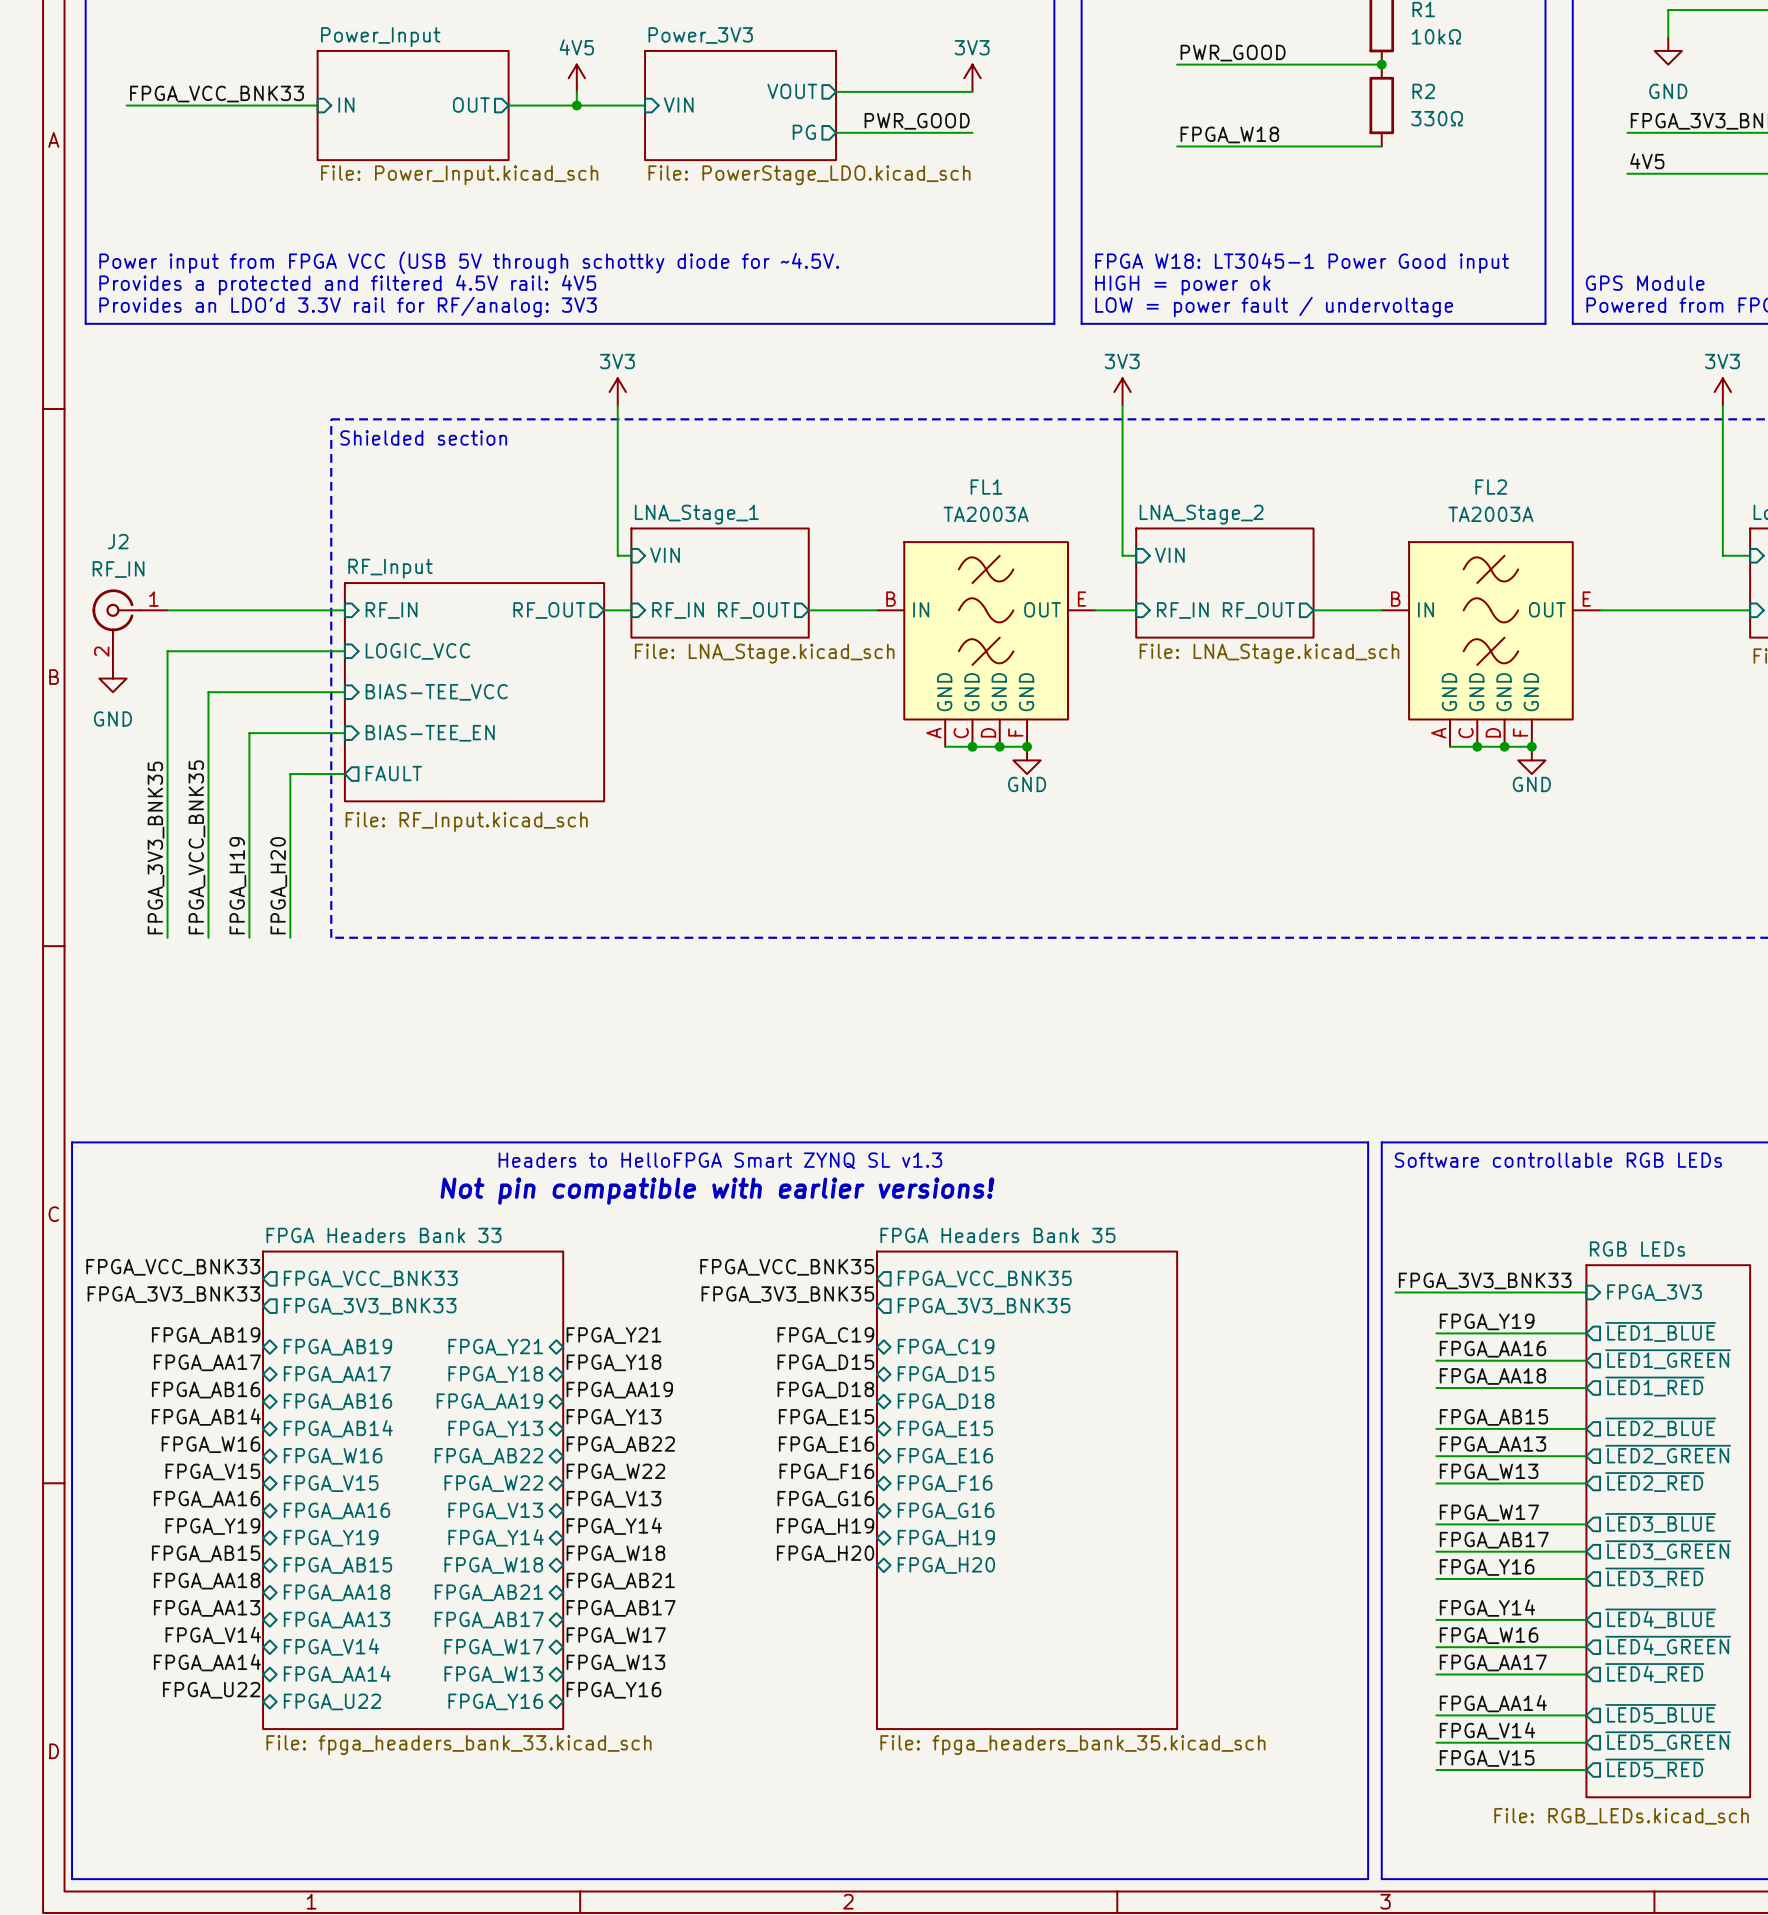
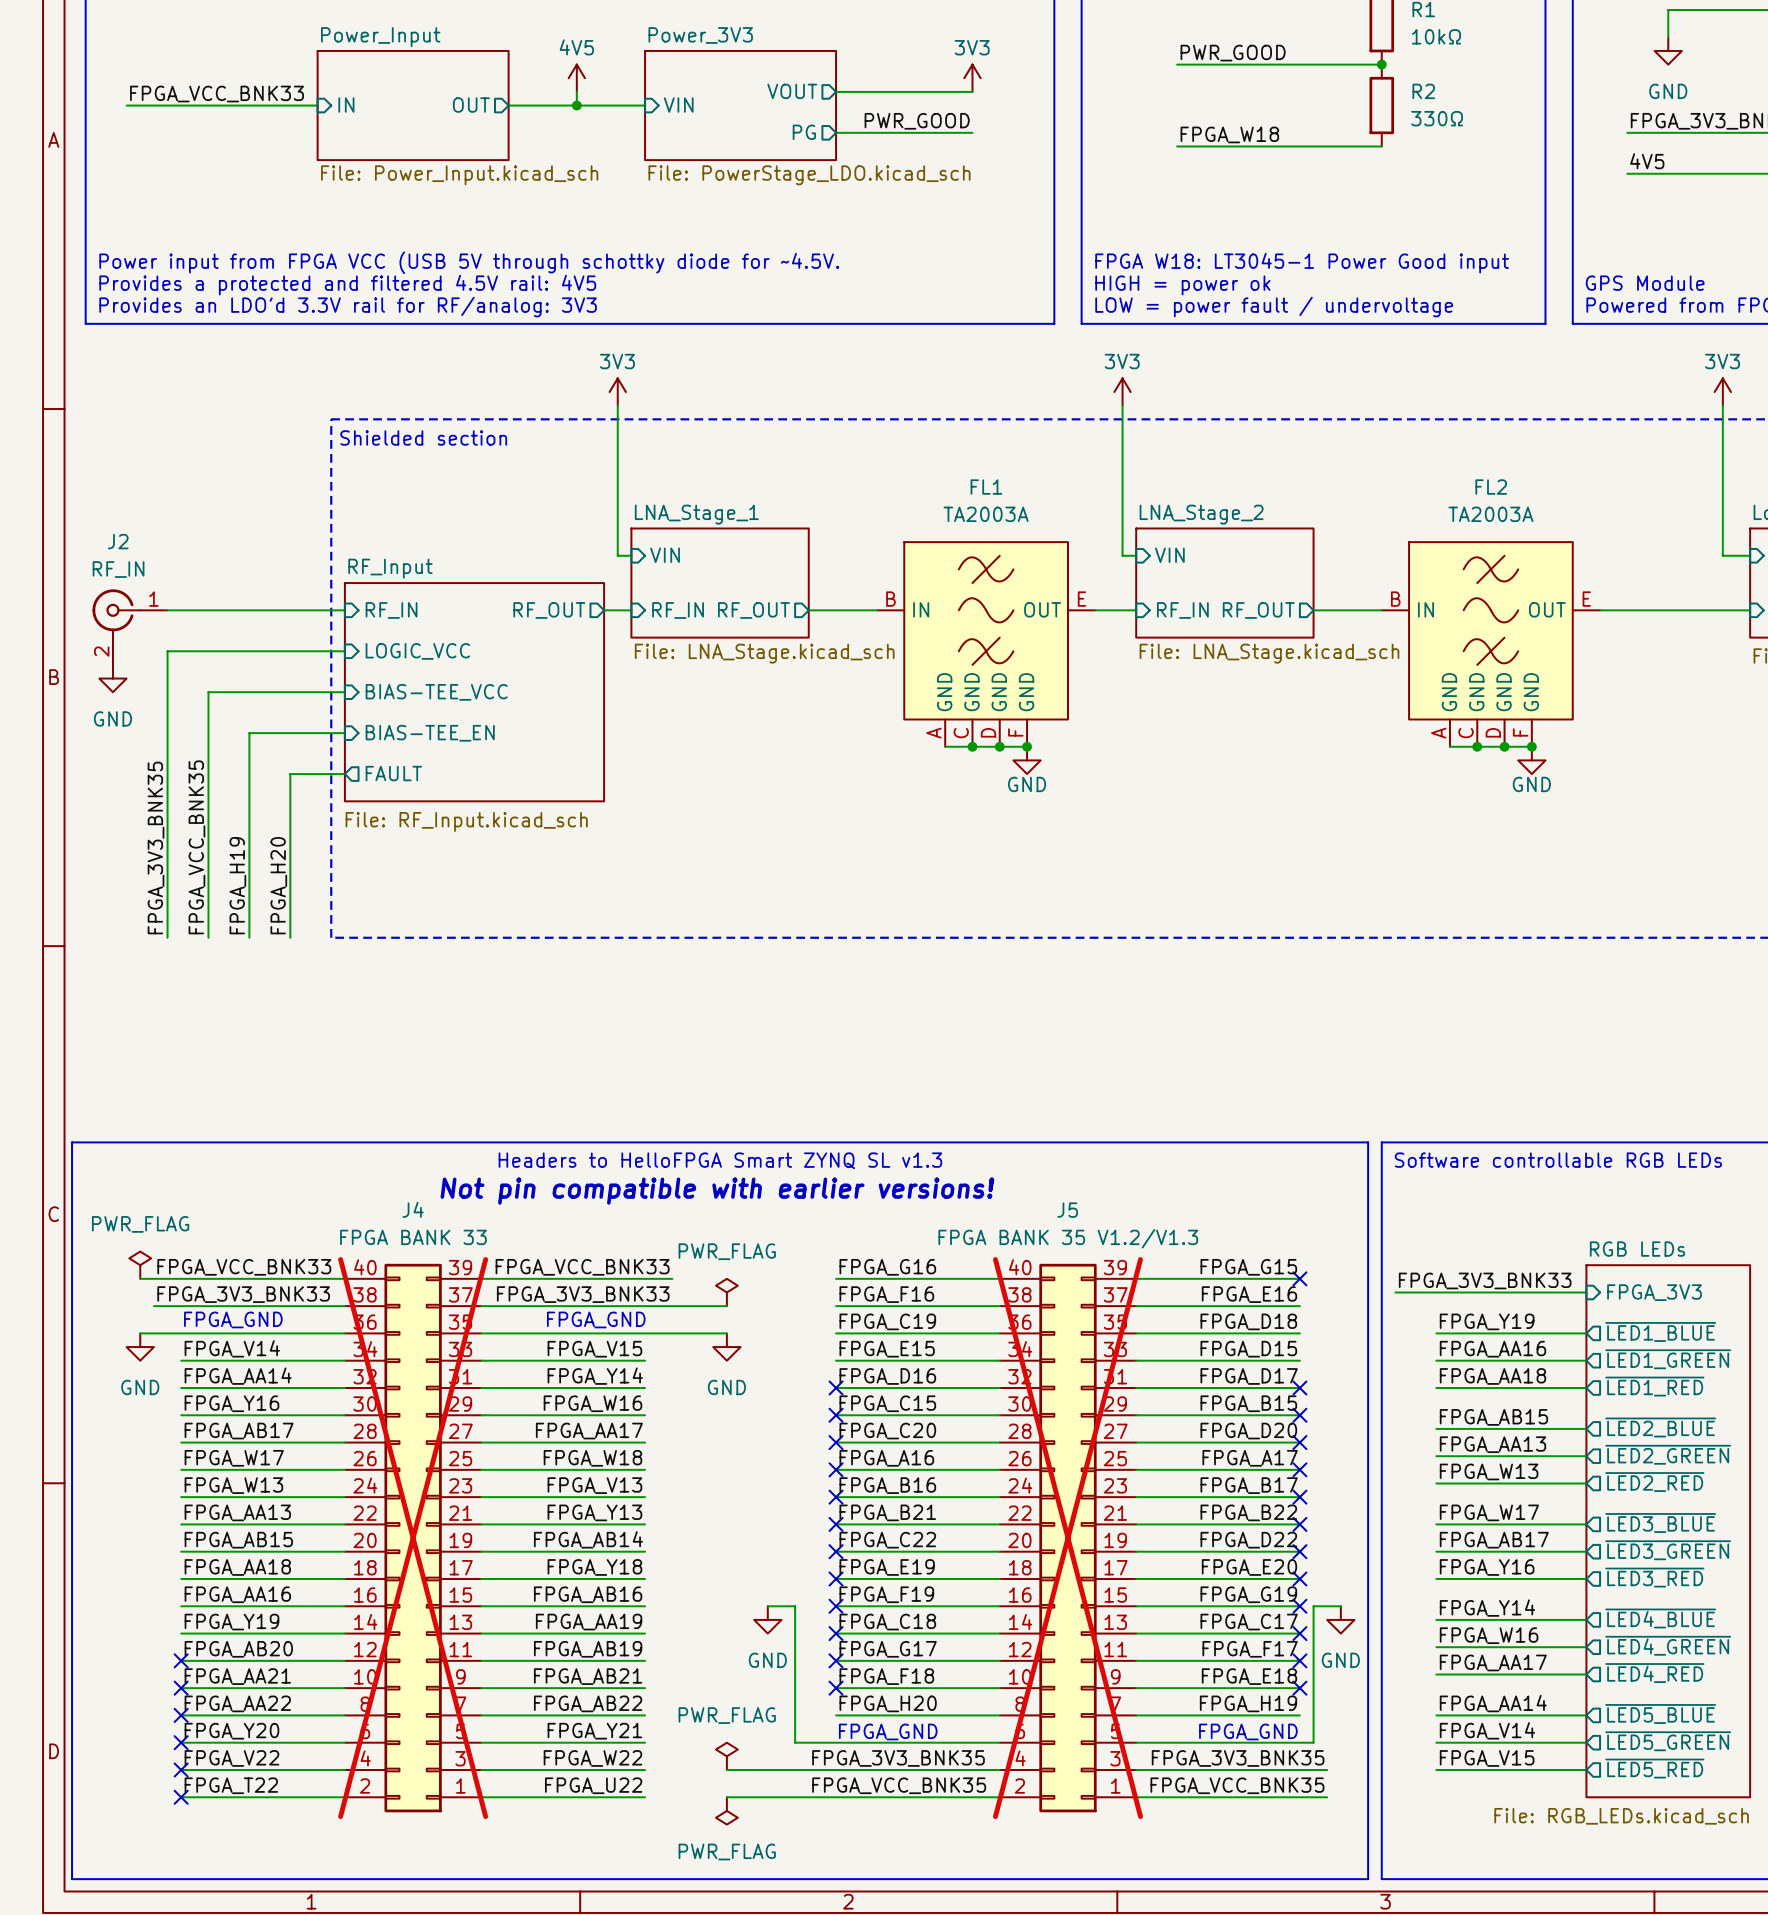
power symbol: none -> PWR_FLAG (140, 1265)
label position: FPGA_VCC_BNK33 (173, 1267) -> FPGA_VCC_BNK33 (244, 1267)
label: none -> FPGA_VCC_BNK33 (582, 1267)
label: FPGA_VCC_BNK35 (787, 1267) -> none
label: none -> FPGA_G15 (1248, 1267)
wire: none -> (140, 1278) (344, 1278)
sheet pin: FPGA_VCC_BNK33 (370, 1278) -> none
wire: none -> (481, 1278) (672, 1278)
wire: none -> (836, 1278) (999, 1278)
sheet pin: FPGA_VCC_BNK35 (984, 1278) -> none
wire: none -> (1136, 1278) (1299, 1278)
no-connect mark: none -> (1299, 1278)
power symbol: none -> PWR_FLAG (726, 1292)
label position: FPGA_3V3_BNK33 (173, 1294) -> FPGA_3V3_BNK33 (243, 1294)
label: none -> FPGA_3V3_BNK33 (583, 1294)
label: FPGA_3V3_BNK35 (787, 1294) -> none
label: none -> FPGA_E16 (1249, 1294)
wire: none -> (153, 1306) (344, 1306)
sheet pin: FPGA_3V3_BNK33 (370, 1306) -> none
wire: none -> (481, 1306) (726, 1306)
wire: none -> (836, 1306) (999, 1306)
sheet pin: FPGA_3V3_BNK35 (984, 1306) -> none
wire: none -> (1136, 1306) (1299, 1306)
text: none -> FPGA_GND (233, 1319)
text: none -> FPGA_GND (596, 1319)
label: none -> FPGA_D18 (1248, 1321)
wire: none -> (140, 1333) (344, 1333)
wire: none -> (481, 1333) (726, 1333)
wire: none -> (836, 1333) (999, 1333)
wire: none -> (1136, 1333) (1299, 1333)
label: FPGA_AB19 (206, 1335) -> none
label: FPGA_Y21 (613, 1335) -> FPGA_V15 (594, 1349)
label position: FPGA_C19 (825, 1335) -> FPGA_C19 (887, 1321)
power symbol: none -> GND (140, 1347)
sheet pin: FPGA_AB19 (337, 1347) -> none
sheet pin: FPGA_Y21 (495, 1347) -> none
power symbol: none -> GND (726, 1347)
sheet pin: FPGA_C19 (946, 1347) -> none
label: none -> FPGA_V14 (232, 1348)
label: none -> FPGA_D15 (1248, 1349)
wire: none -> (181, 1360) (344, 1360)
wire: none -> (481, 1360) (645, 1360)
wire: none -> (836, 1360) (999, 1360)
wire: none -> (1136, 1360) (1299, 1360)
label: FPGA_AA17 (207, 1362) -> none
label position: FPGA_Y18 (613, 1362) -> FPGA_Y18 (594, 1567)
label: FPGA_D15 (825, 1362) -> none
sheet pin: FPGA_AA17 (337, 1374) -> none
sheet pin: FPGA_Y18 (495, 1374) -> none
sheet pin: FPGA_D15 (946, 1374) -> none
label: none -> FPGA_AA14 (238, 1376)
label: none -> FPGA_D16 (887, 1376)
label: none -> FPGA_D17 (1249, 1376)
wire: none -> (181, 1387) (344, 1387)
wire: none -> (481, 1387) (645, 1387)
wire: none -> (836, 1387) (999, 1387)
no-connect mark: none -> (836, 1387)
wire: none -> (1136, 1387) (1299, 1387)
no-connect mark: none -> (1299, 1387)
label: FPGA_AB16 (206, 1390) -> none
label position: FPGA_AA19 (619, 1390) -> FPGA_AA19 (589, 1622)
label: FPGA_D18 (825, 1390) -> none
sheet pin: FPGA_AB16 (337, 1401) -> none
sheet pin: FPGA_AA19 (489, 1401) -> none
sheet pin: FPGA_D18 (946, 1401) -> none
label: none -> FPGA_Y16 (231, 1403)
label: none -> FPGA_W16 (592, 1403)
label: none -> FPGA_C15 (887, 1403)
label: none -> FPGA_B15 (1248, 1403)
wire: none -> (181, 1415) (344, 1415)
wire: none -> (481, 1415) (645, 1415)
wire: none -> (836, 1415) (999, 1415)
no-connect mark: none -> (836, 1415)
wire: none -> (1136, 1415) (1299, 1415)
no-connect mark: none -> (1299, 1415)
label: FPGA_AB14 (206, 1417) -> none
label position: FPGA_Y13 (613, 1417) -> FPGA_Y13 (594, 1512)
label position: FPGA_E15 (826, 1417) -> FPGA_E15 (887, 1349)
sheet pin: FPGA_AB14 (338, 1428) -> none
sheet pin: FPGA_Y13 (495, 1429) -> none
sheet pin: FPGA_E15 (945, 1429) -> none
label: none -> FPGA_AB17 (239, 1431)
label: none -> FPGA_C20 (887, 1431)
label: none -> FPGA_D20 (1248, 1431)
wire: none -> (181, 1442) (344, 1442)
wire: none -> (481, 1442) (645, 1442)
wire: none -> (836, 1442) (999, 1442)
no-connect mark: none -> (836, 1442)
wire: none -> (1136, 1442) (1299, 1442)
no-connect mark: none -> (1299, 1442)
label: FPGA_W16 (210, 1444) -> none
label: FPGA_AB22 (620, 1444) -> FPGA_AA17 (589, 1431)
label: FPGA_E16 (826, 1444) -> none
sheet pin: FPGA_W16 (333, 1456) -> none
sheet pin: FPGA_AB22 (488, 1456) -> none
sheet pin: FPGA_E16 (945, 1456) -> none
label: none -> FPGA_W17 (234, 1458)
label: none -> FPGA_A16 (886, 1458)
label: none -> FPGA_A17 (1250, 1458)
wire: none -> (181, 1469) (344, 1469)
wire: none -> (481, 1469) (645, 1469)
wire: none -> (836, 1469) (999, 1469)
no-connect mark: none -> (836, 1469)
wire: none -> (1136, 1469) (1299, 1469)
no-connect mark: none -> (1299, 1469)
label: FPGA_V15 (212, 1471) -> none
label: FPGA_W22 (615, 1471) -> none
label position: FPGA_F16 (826, 1471) -> FPGA_F16 (886, 1294)
sheet pin: FPGA_V15 (331, 1483) -> none
sheet pin: FPGA_W22 (493, 1483) -> none
sheet pin: FPGA_F16 (945, 1483) -> none
label: none -> FPGA_W13 (233, 1485)
label: none -> FPGA_B16 (887, 1485)
label: none -> FPGA_B17 (1249, 1485)
sheet FPGA Headers Bank 33: File: fpga_headers_bank_33.kicad_sch (413, 1490) -> none
sheet FPGA Headers Bank 35: File: fpga_headers_bank_35.kicad_sch (1027, 1490) -> none
wire: none -> (181, 1497) (344, 1497)
wire: none -> (481, 1497) (645, 1497)
wire: none -> (836, 1497) (999, 1497)
no-connect mark: none -> (836, 1497)
wire: none -> (1136, 1497) (1299, 1497)
no-connect mark: none -> (1299, 1497)
label position: FPGA_AA16 (207, 1499) -> FPGA_AA16 (237, 1594)
label position: FPGA_V13 (613, 1499) -> FPGA_V13 (594, 1485)
label position: FPGA_G16 (825, 1499) -> FPGA_G16 (887, 1267)
sheet pin: FPGA_AA16 (336, 1510) -> none
sheet pin: FPGA_V13 (495, 1510) -> none
sheet pin: FPGA_G16 (946, 1510) -> none
label: none -> FPGA_B21 (887, 1512)
label: none -> FPGA_B22 (1248, 1512)
wire: none -> (181, 1524) (344, 1524)
wire: none -> (481, 1524) (645, 1524)
wire: none -> (836, 1524) (999, 1524)
no-connect mark: none -> (836, 1524)
wire: none -> (1136, 1524) (1299, 1524)
no-connect mark: none -> (1299, 1524)
label position: FPGA_Y19 (212, 1526) -> FPGA_Y19 (231, 1622)
label position: FPGA_Y14 (614, 1526) -> FPGA_Y14 (595, 1376)
label: FPGA_H19 (825, 1526) -> none
sheet pin: FPGA_Y14 (496, 1537) -> none
sheet pin: FPGA_Y19 (331, 1538) -> none
J4: none -> FPGA BANK 33 (413, 1538)
sheet pin: FPGA_H19 (946, 1538) -> none
J5: none -> FPGA BANK 35 V1.2/V1.3 (1067, 1538)
label: none -> FPGA_AB14 (588, 1539)
label: none -> FPGA_C22 (887, 1540)
label: none -> FPGA_D22 (1248, 1540)
wire: none -> (181, 1551) (344, 1551)
wire: none -> (481, 1551) (645, 1551)
wire: none -> (836, 1551) (999, 1551)
no-connect mark: none -> (836, 1551)
wire: none -> (1136, 1551) (1299, 1551)
no-connect mark: none -> (1299, 1551)
label position: FPGA_AB15 (206, 1553) -> FPGA_AB15 (238, 1540)
label position: FPGA_W18 (615, 1553) -> FPGA_W18 (592, 1458)
label position: FPGA_H20 (825, 1553) -> FPGA_H20 (888, 1703)
sheet pin: FPGA_AB15 (337, 1565) -> none
sheet pin: FPGA_W18 (493, 1565) -> none
sheet pin: FPGA_H20 (946, 1565) -> none
label: none -> FPGA_E19 (887, 1567)
label: none -> FPGA_E20 (1249, 1567)
wire: none -> (181, 1578) (344, 1578)
wire: none -> (481, 1578) (645, 1578)
wire: none -> (836, 1578) (999, 1578)
no-connect mark: none -> (836, 1578)
wire: none -> (1136, 1578) (1299, 1578)
no-connect mark: none -> (1299, 1578)
label position: FPGA_AA18 (207, 1581) -> FPGA_AA18 (237, 1567)
label position: FPGA_AB21 (620, 1581) -> FPGA_AB21 (588, 1676)
sheet pin: FPGA_AA18 (336, 1592) -> none
sheet pin: FPGA_AB21 (488, 1592) -> none
label: none -> FPGA_F19 (886, 1594)
label: none -> FPGA_G19 (1248, 1594)
wire: none -> (181, 1606) (344, 1606)
wire: none -> (481, 1606) (645, 1606)
wire: none -> (767, 1606) (795, 1606) (795, 1742) (999, 1742)
wire: none -> (836, 1606) (999, 1606)
no-connect mark: none -> (836, 1606)
wire: none -> (1136, 1606) (1299, 1606)
no-connect mark: none -> (1299, 1606)
wire: none -> (1340, 1606) (1313, 1606) (1313, 1742) (1136, 1742)
label position: FPGA_AA13 (207, 1608) -> FPGA_AA13 (237, 1512)
label: FPGA_AB17 (621, 1608) -> FPGA_AB16 (588, 1594)
power symbol: none -> GND (767, 1619)
power symbol: none -> GND (1340, 1619)
sheet pin: FPGA_AA13 (336, 1620) -> none
sheet pin: FPGA_AB17 (489, 1620) -> none
label: none -> FPGA_C18 (887, 1622)
label: none -> FPGA_C17 (1249, 1622)
wire: none -> (181, 1633) (344, 1633)
wire: none -> (481, 1633) (645, 1633)
wire: none -> (836, 1633) (999, 1633)
no-connect mark: none -> (836, 1633)
wire: none -> (1136, 1633) (1299, 1633)
no-connect mark: none -> (1299, 1633)
label: FPGA_V14 (213, 1635) -> none
label: FPGA_W17 (616, 1635) -> none
sheet pin: FPGA_V14 (331, 1647) -> none
sheet pin: FPGA_W17 (494, 1647) -> none
label: none -> FPGA_AB20 (238, 1649)
label: none -> FPGA_AB19 (588, 1649)
label: none -> FPGA_G17 (888, 1649)
label: none -> FPGA_F17 (1250, 1649)
wire: none -> (181, 1660) (344, 1660)
no-connect mark: none -> (181, 1660)
wire: none -> (481, 1660) (645, 1660)
wire: none -> (836, 1660) (999, 1660)
no-connect mark: none -> (836, 1660)
wire: none -> (1136, 1660) (1299, 1660)
no-connect mark: none -> (1299, 1660)
label: FPGA_AA14 (207, 1662) -> none
label: FPGA_W13 (615, 1662) -> none
sheet pin: FPGA_AA14 (337, 1674) -> none
sheet pin: FPGA_W13 (493, 1674) -> none
label: none -> FPGA_AA21 (237, 1676)
label: none -> FPGA_F18 (886, 1676)
label: none -> FPGA_E18 (1249, 1676)
wire: none -> (181, 1688) (344, 1688)
no-connect mark: none -> (181, 1688)
wire: none -> (481, 1688) (645, 1688)
wire: none -> (836, 1688) (999, 1688)
no-connect mark: none -> (836, 1688)
wire: none -> (1136, 1688) (1299, 1688)
no-connect mark: none -> (1299, 1688)
label: FPGA_U22 (211, 1690) -> none
label: FPGA_Y16 (613, 1690) -> none
sheet pin: FPGA_U22 (332, 1701) -> none
sheet pin: FPGA_Y16 (495, 1701) -> none
label: none -> FPGA_AA22 (237, 1703)
label: none -> FPGA_AB22 (588, 1703)
label: none -> FPGA_H19 (1248, 1703)
wire: none -> (181, 1715) (344, 1715)
no-connect mark: none -> (181, 1715)
wire: none -> (481, 1715) (645, 1715)
wire: none -> (836, 1715) (999, 1715)
wire: none -> (1136, 1715) (1299, 1715)
label: none -> FPGA_Y20 (231, 1731)
label: none -> FPGA_Y21 (594, 1731)
text: none -> FPGA_GND (888, 1731)
text: none -> FPGA_GND (1248, 1731)
wire: none -> (181, 1742) (344, 1742)
no-connect mark: none -> (181, 1742)
wire: none -> (481, 1742) (645, 1742)
power symbol: none -> PWR_FLAG (726, 1756)
label: none -> FPGA_V22 (231, 1758)
label: none -> FPGA_W22 (592, 1758)
label: none -> FPGA_3V3_BNK35 (898, 1758)
label: none -> FPGA_3V3_BNK35 (1238, 1758)
wire: none -> (181, 1769) (344, 1769)
no-connect mark: none -> (181, 1769)
wire: none -> (481, 1769) (645, 1769)
wire: none -> (726, 1769) (999, 1769)
wire: none -> (1136, 1769) (1327, 1769)
label: none -> FPGA_T22 (231, 1785)
label: none -> FPGA_U22 (593, 1785)
label: none -> FPGA_VCC_BNK35 (899, 1785)
label: none -> FPGA_VCC_BNK35 (1237, 1785)
wire: none -> (181, 1797) (344, 1797)
no-connect mark: none -> (181, 1797)
wire: none -> (481, 1797) (645, 1797)
wire: none -> (726, 1797) (999, 1797)
wire: none -> (1136, 1797) (1327, 1797)
power symbol: none -> PWR_FLAG (726, 1810)

